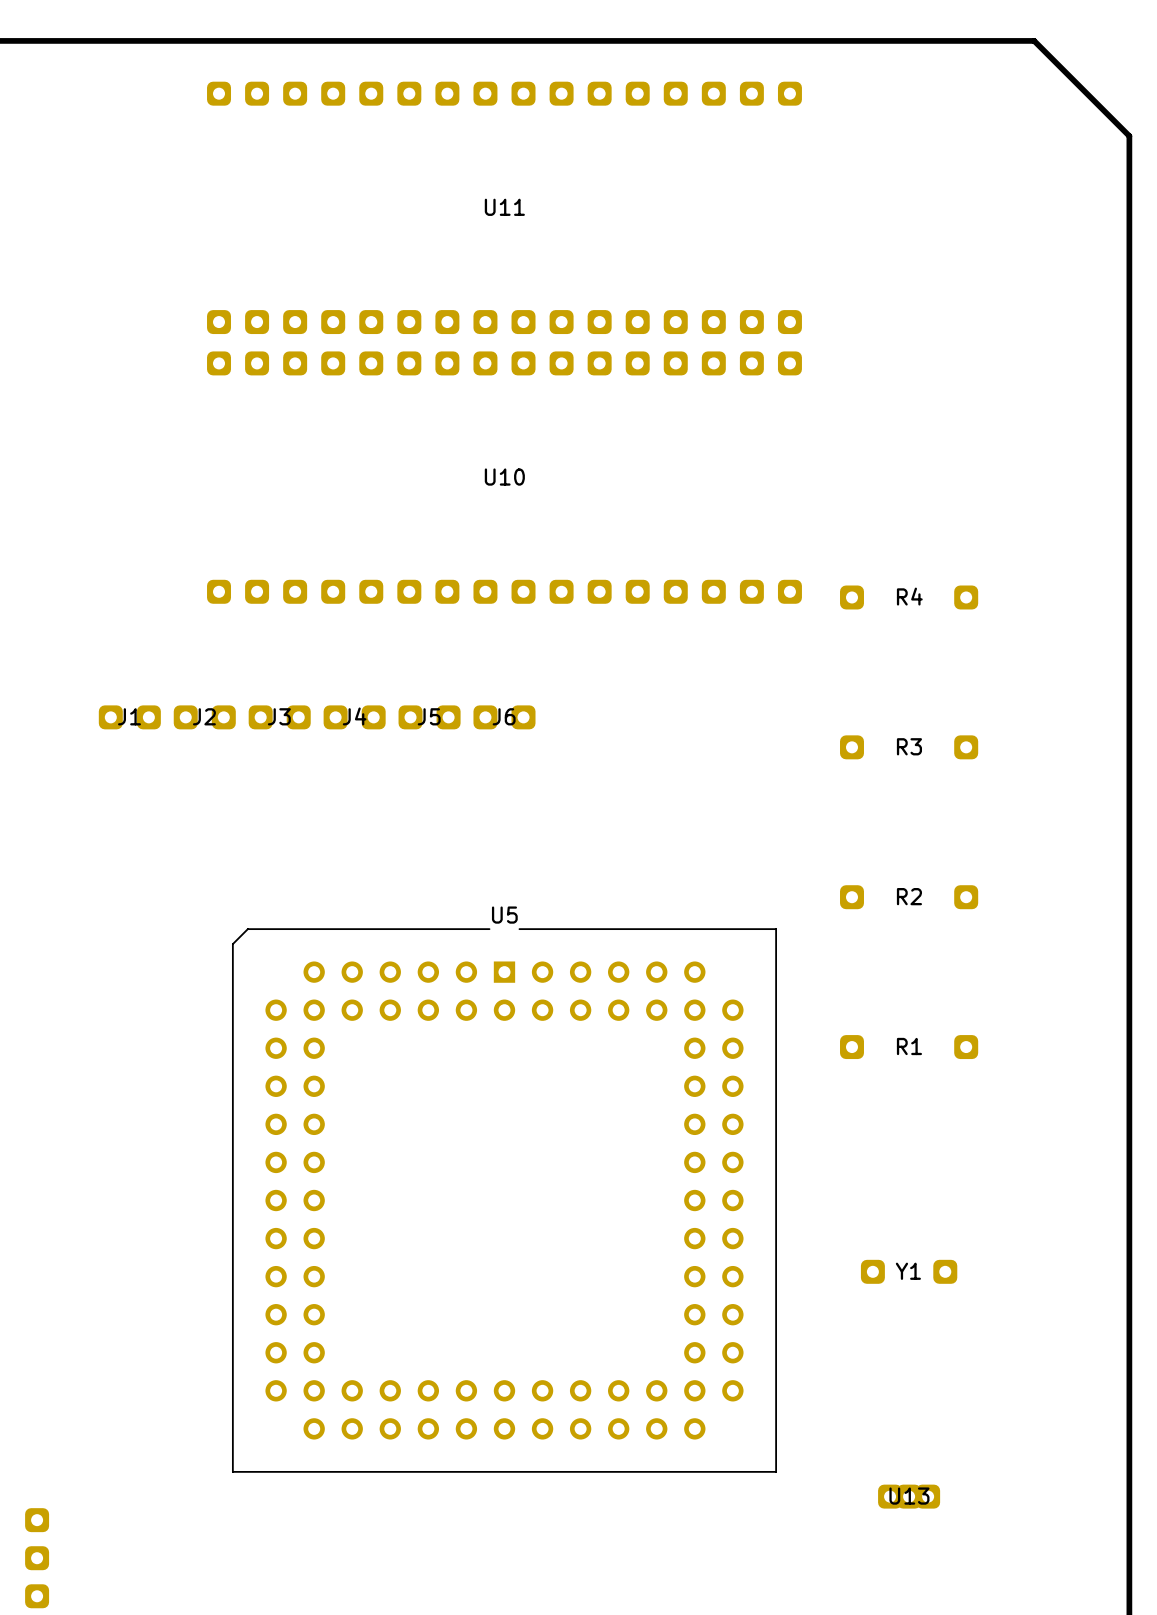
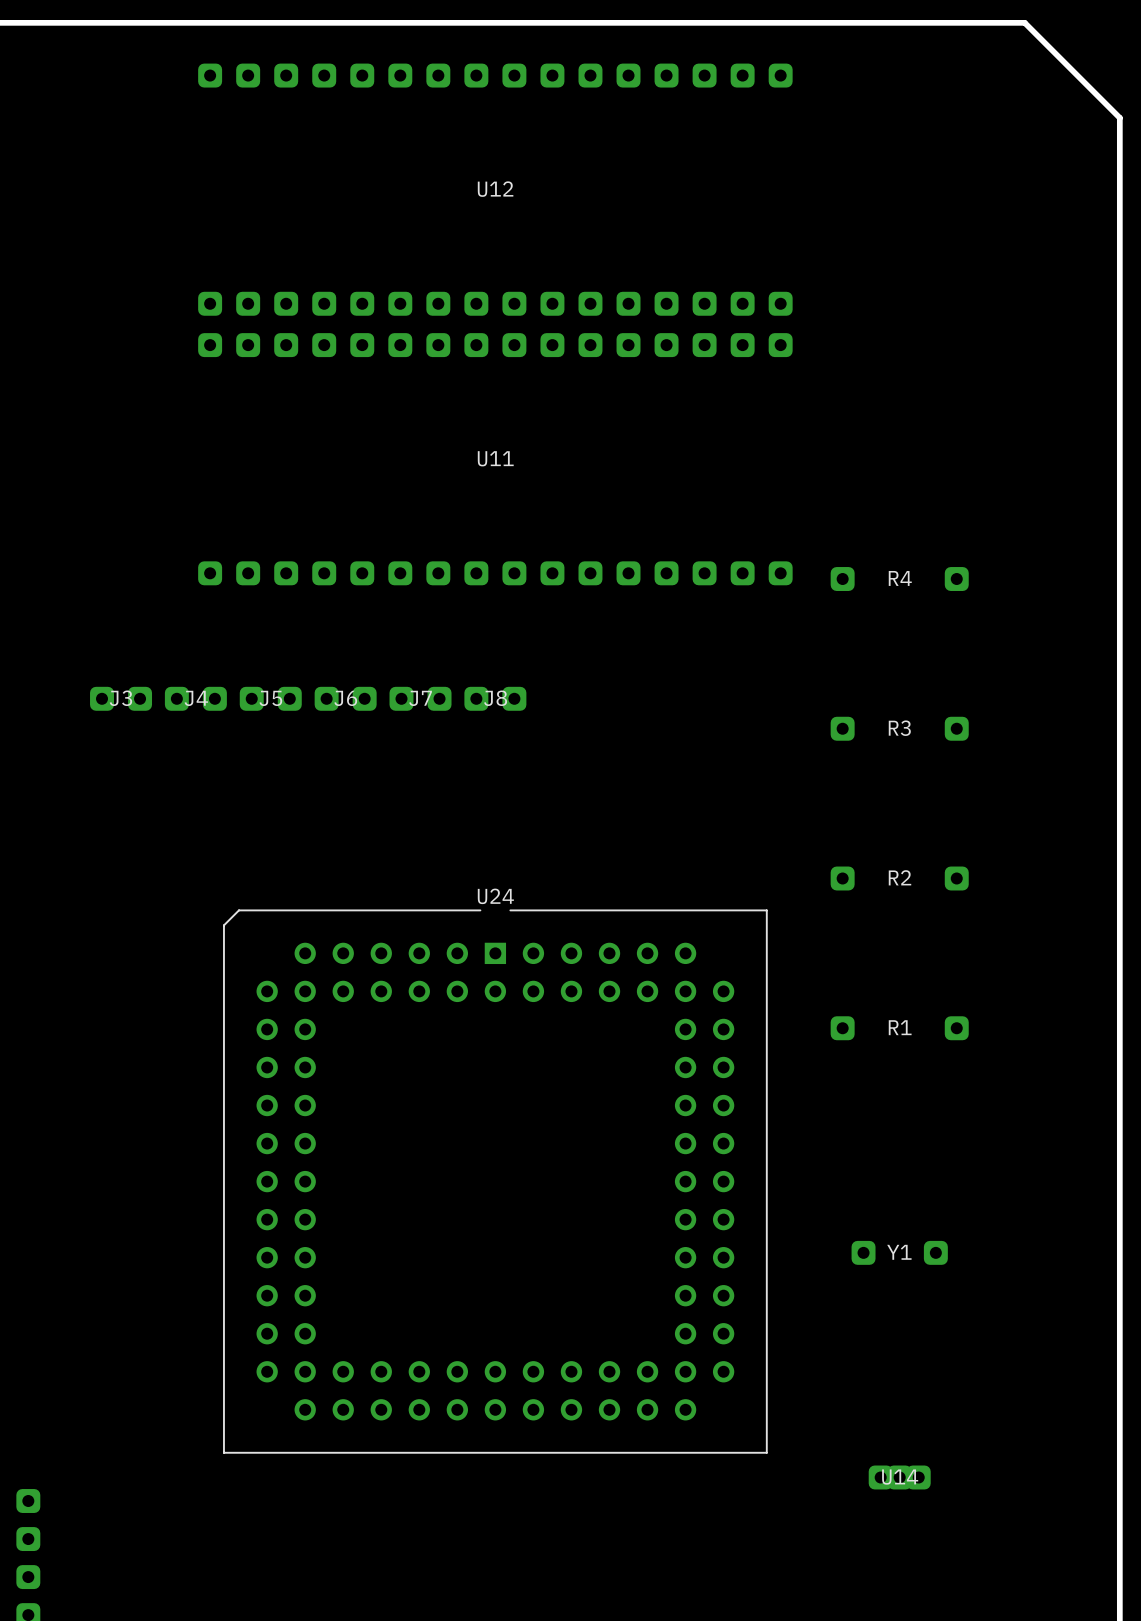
U11 name: U11 (504, 207) -> U12 (495, 189)
U10 name: U10 (504, 477) -> U11 (495, 458)
J1 name: J1 (129, 716) -> J3 (120, 698)
J2 name: J2 (204, 716) -> J4 (196, 698)
J3 name: J3 (279, 716) -> J5 (270, 698)
J4 name: J4 (354, 716) -> J6 (345, 698)
J5 name: J5 (429, 716) -> J7 (420, 698)
J6 name: J6 (504, 716) -> J8 (495, 698)
U5 name: U5 (504, 915) -> U24 (495, 896)
U13 name: U13 (909, 1496) -> U14 (900, 1477)

